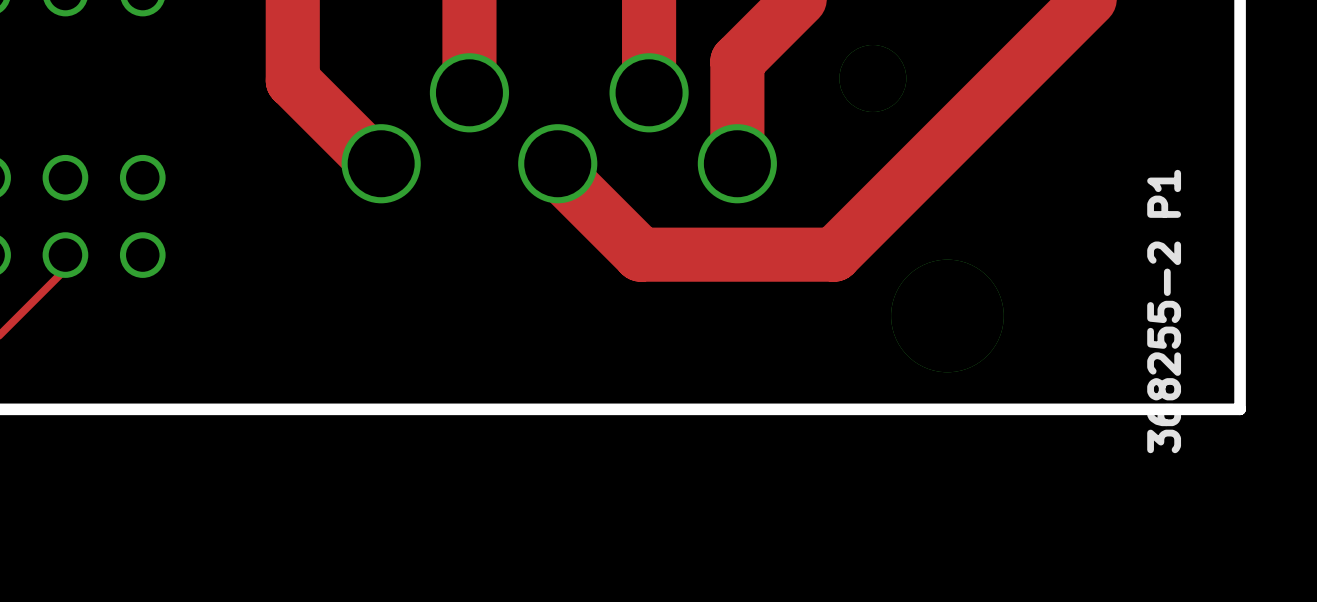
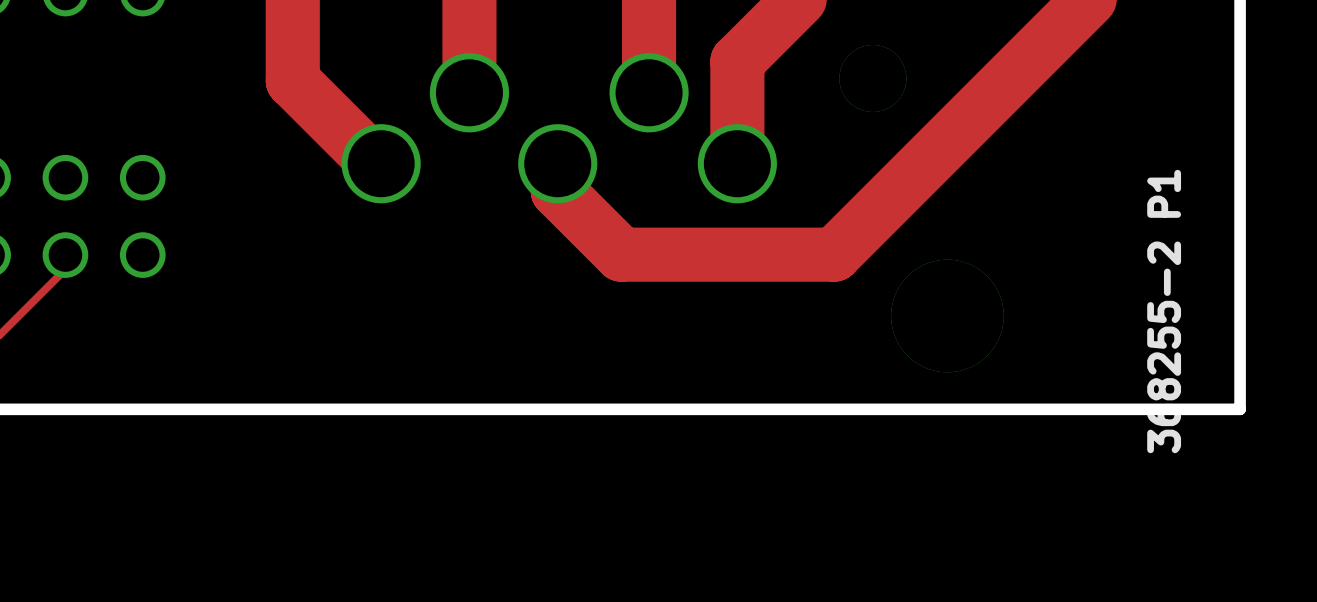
track: (557, 171) (640, 254) -> (557, 171) (557, 190) (621, 254) (640, 254)

